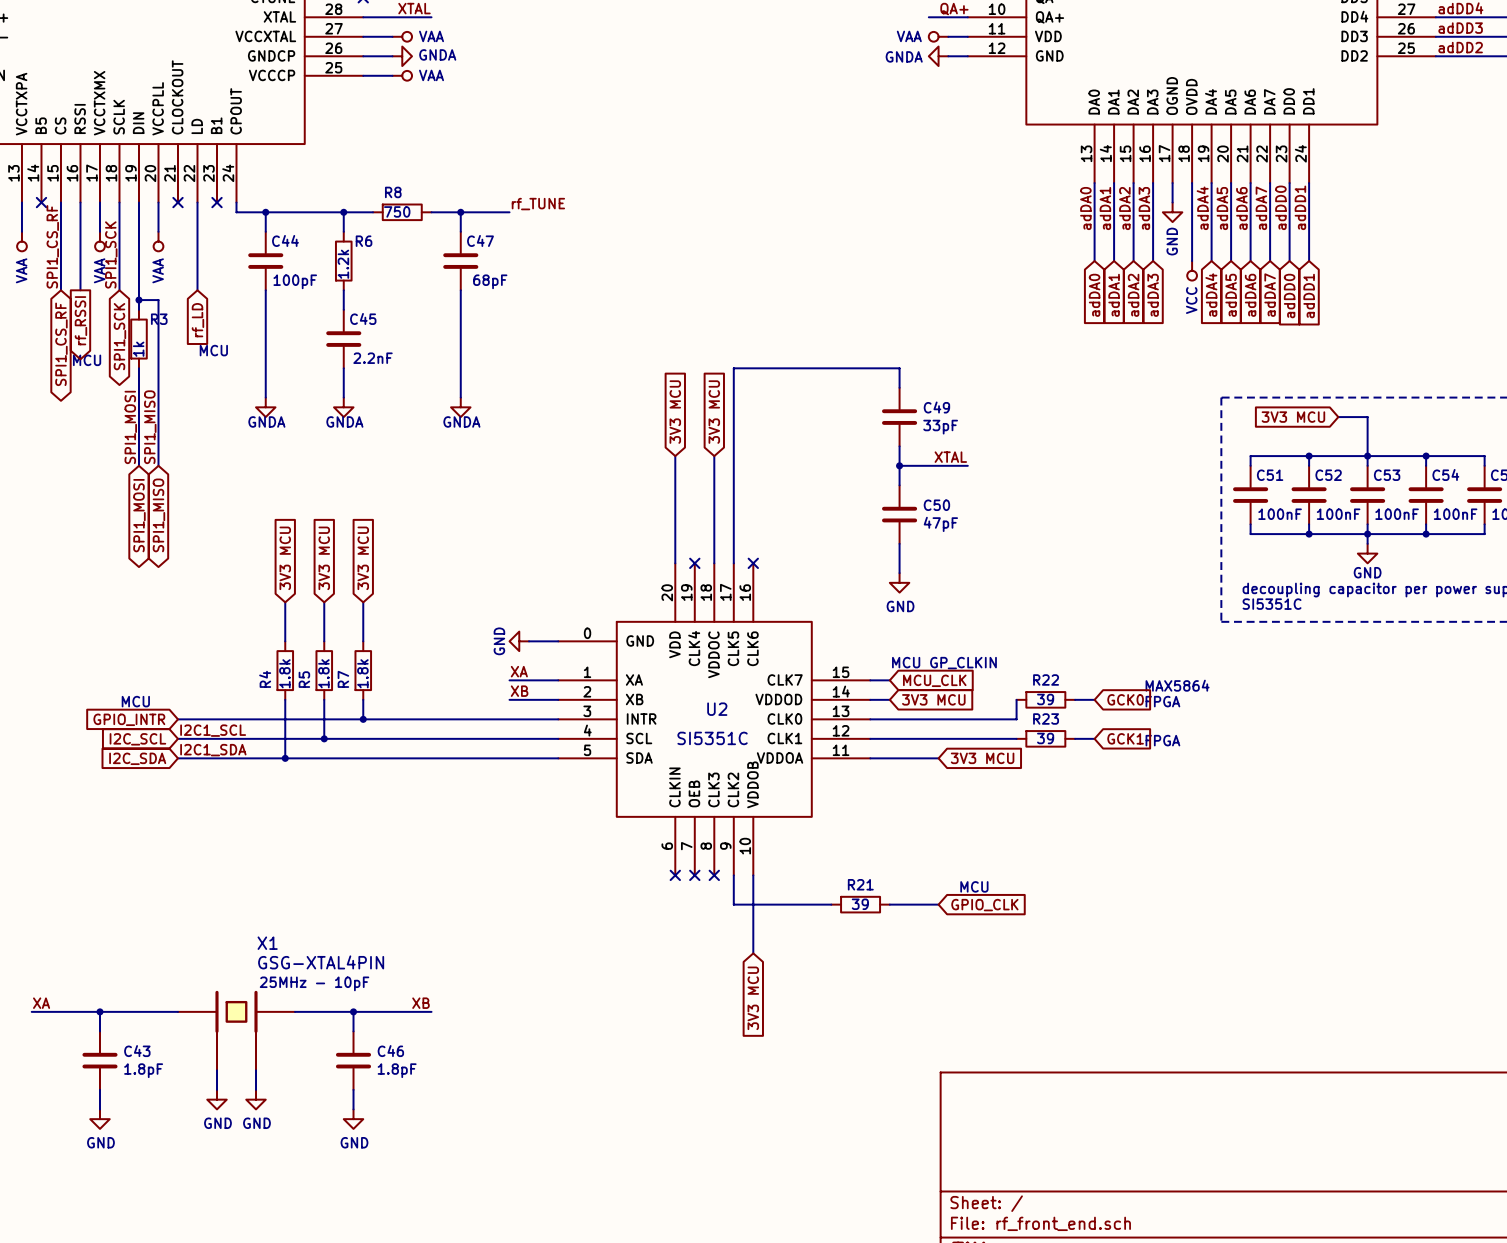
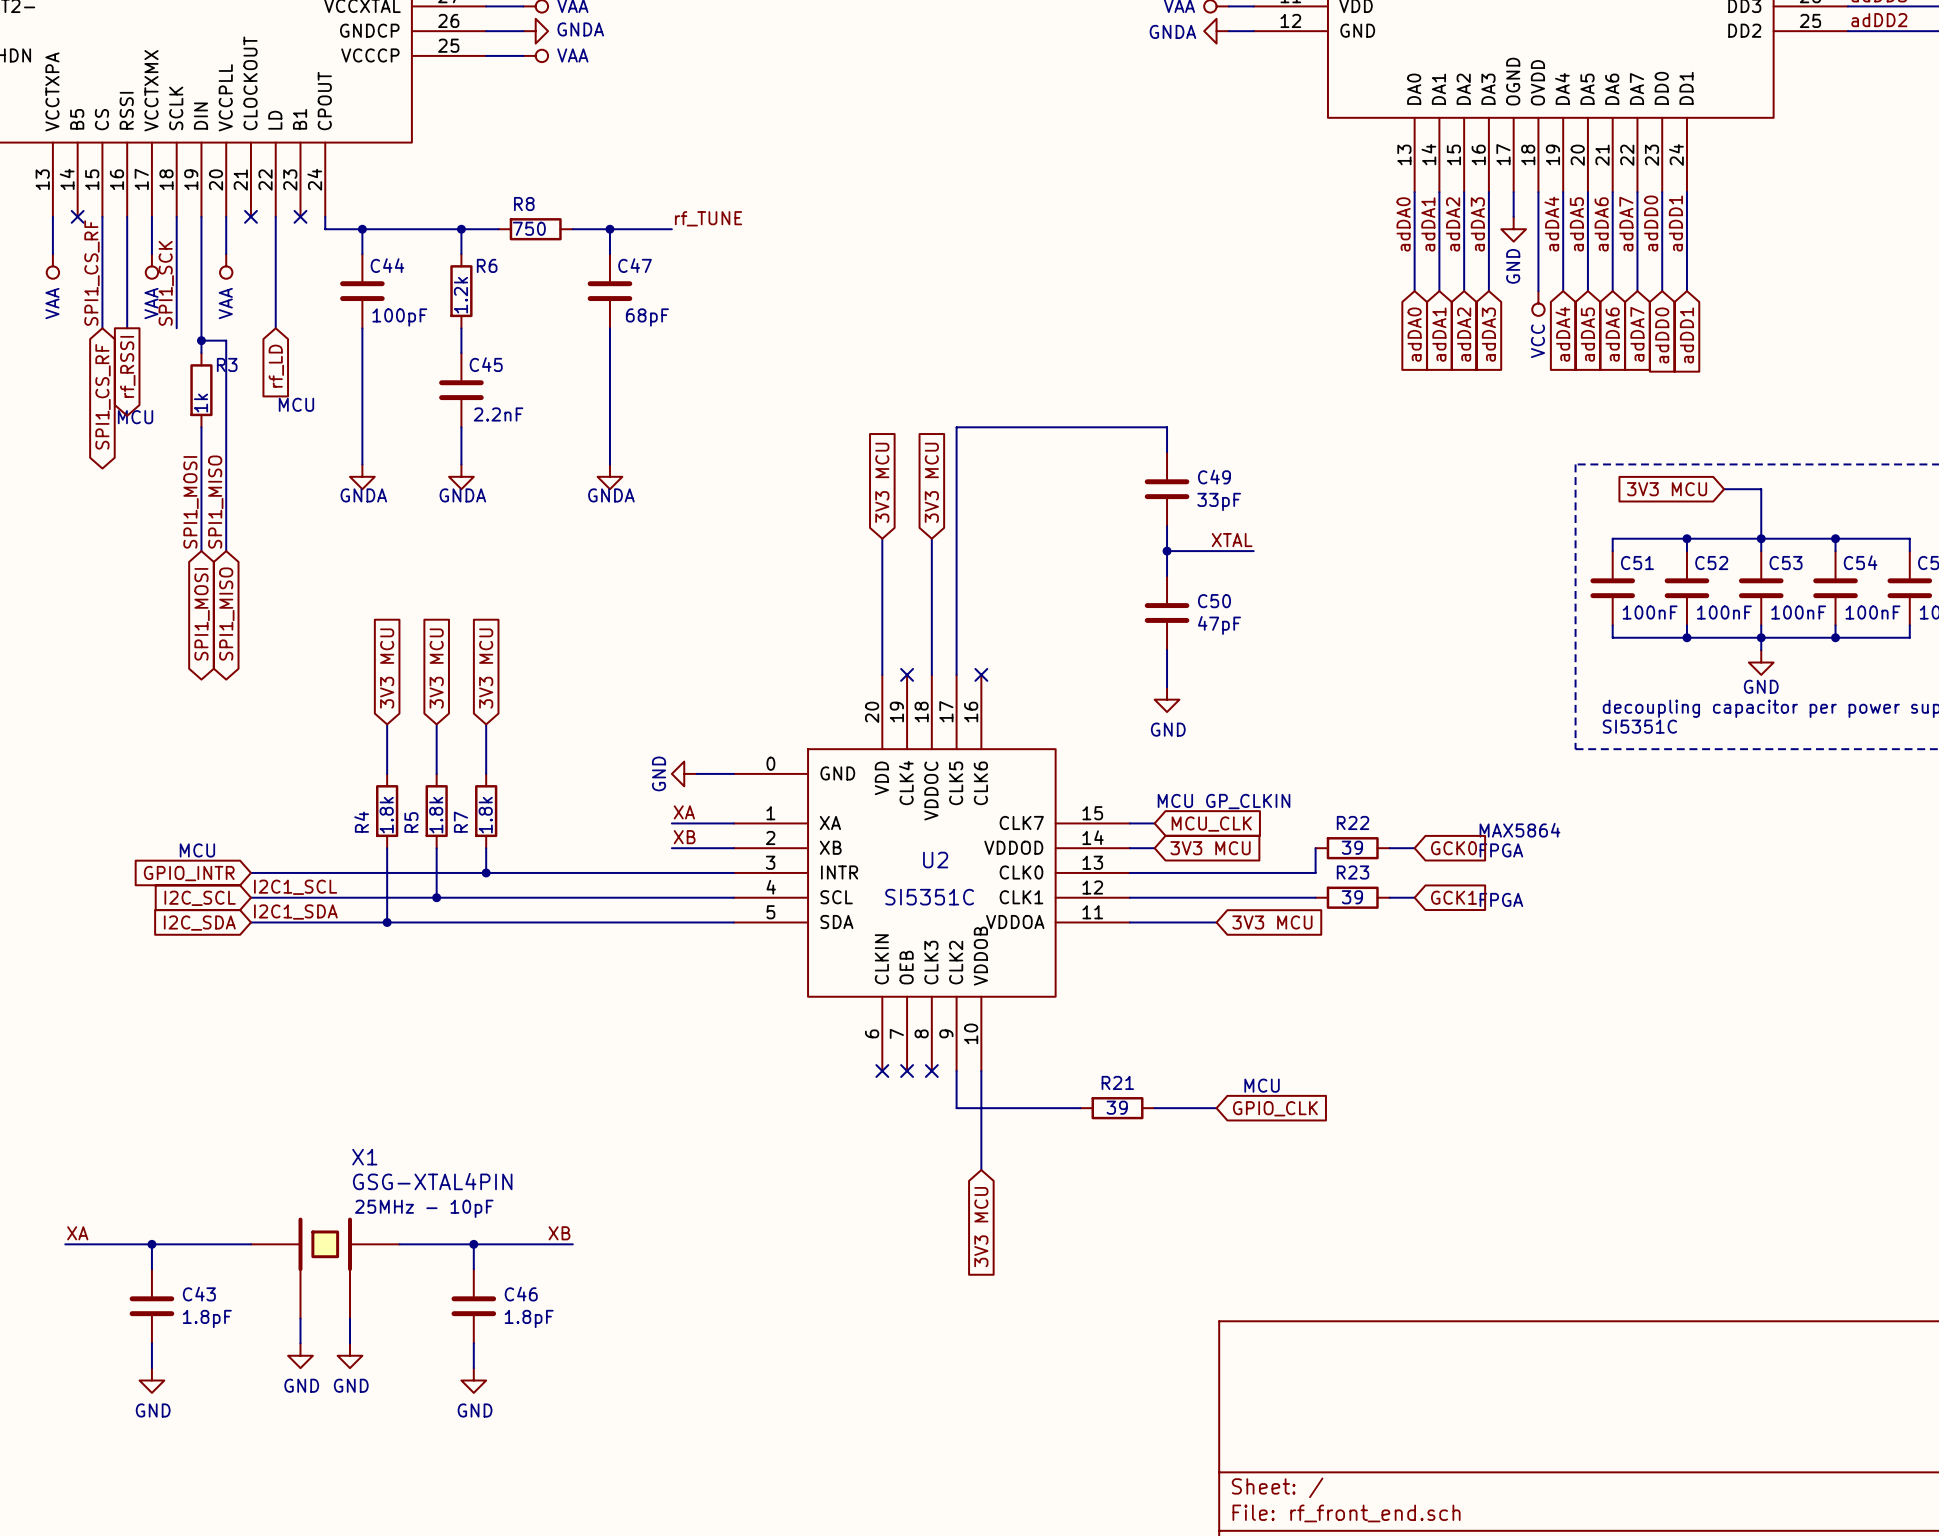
global label: SPI1_SCK (119, 336) -> none

